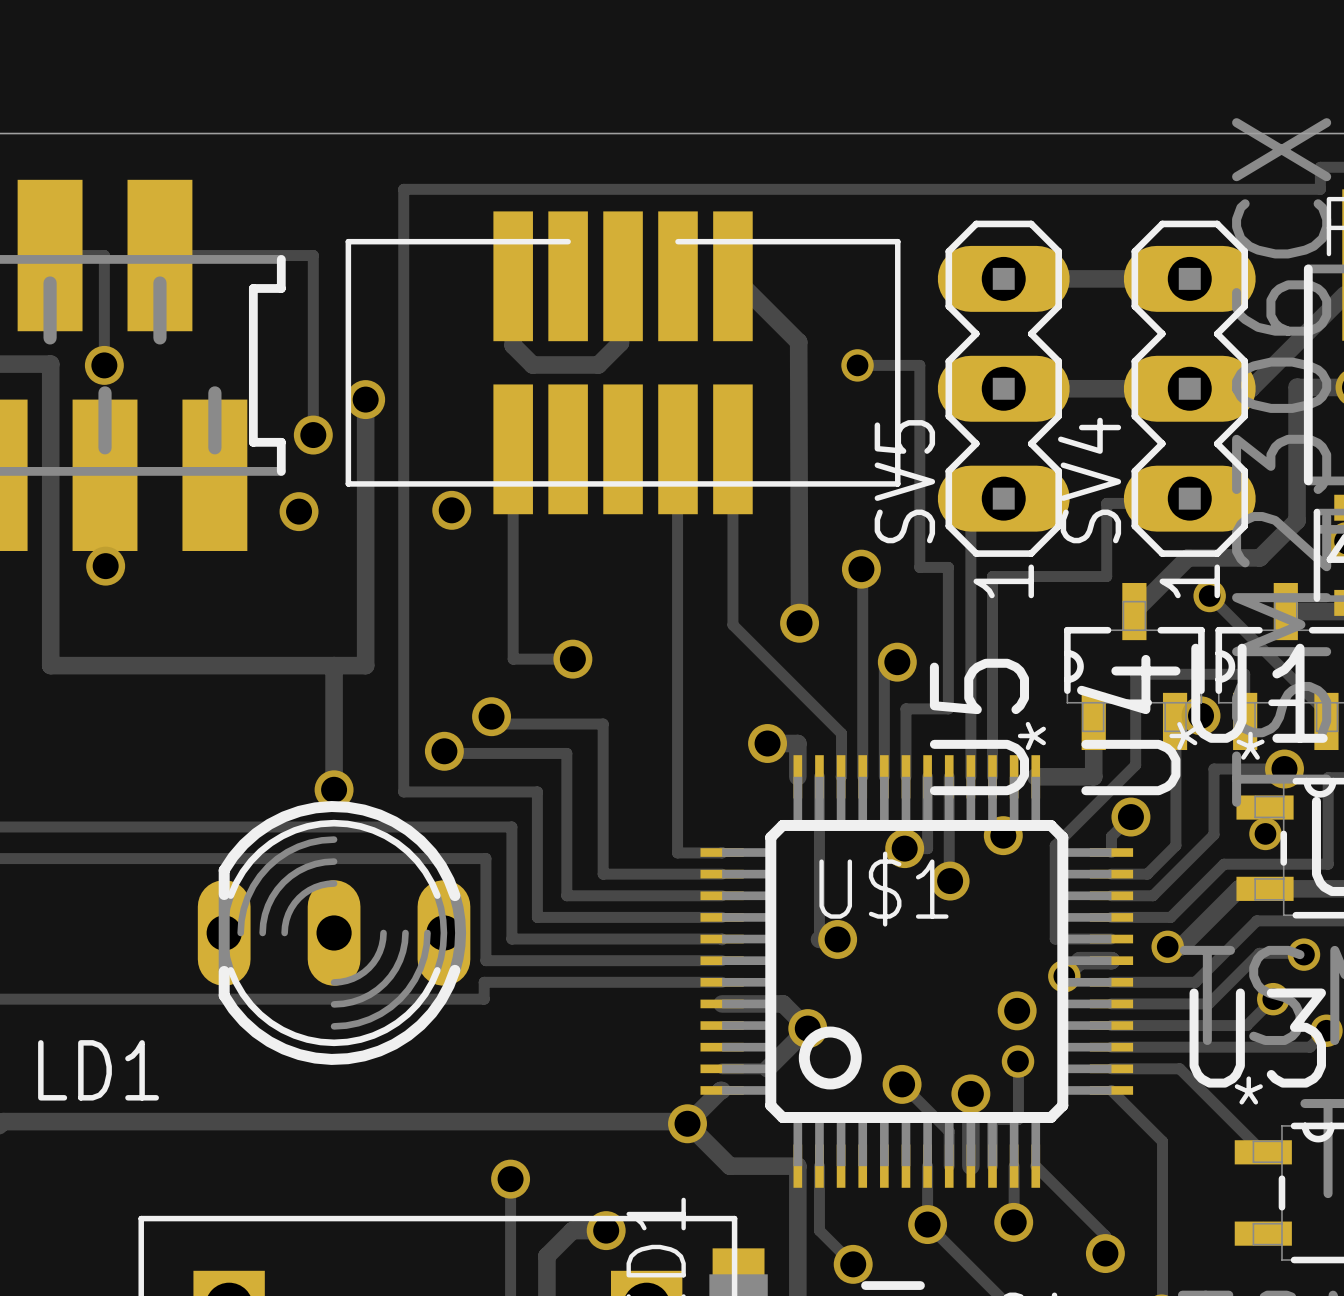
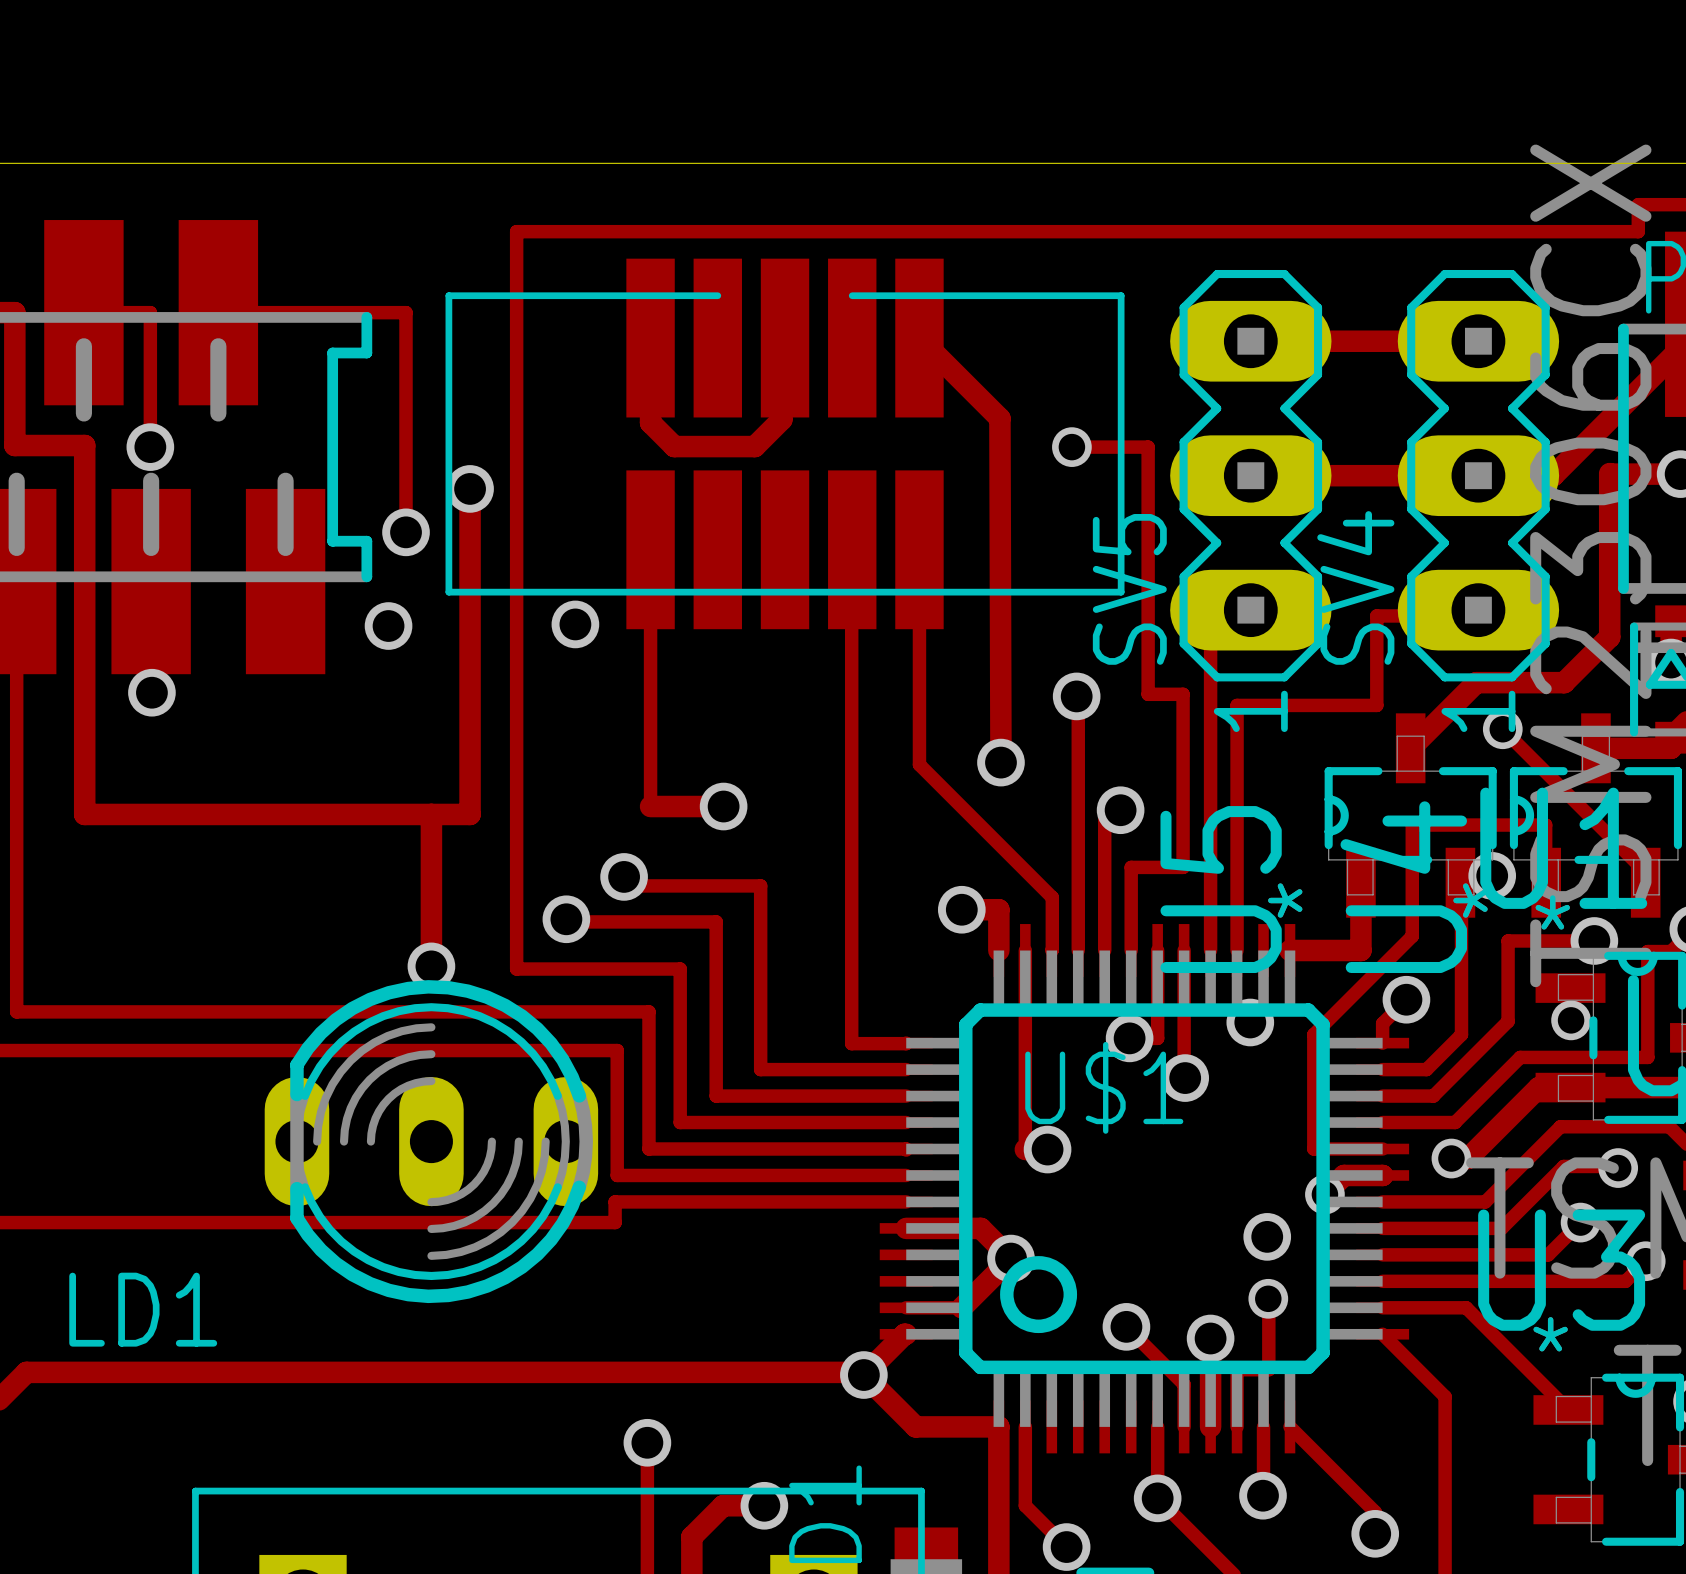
track width: thin (513, 659) (572, 659) -> thick (650, 806) (723, 806)

